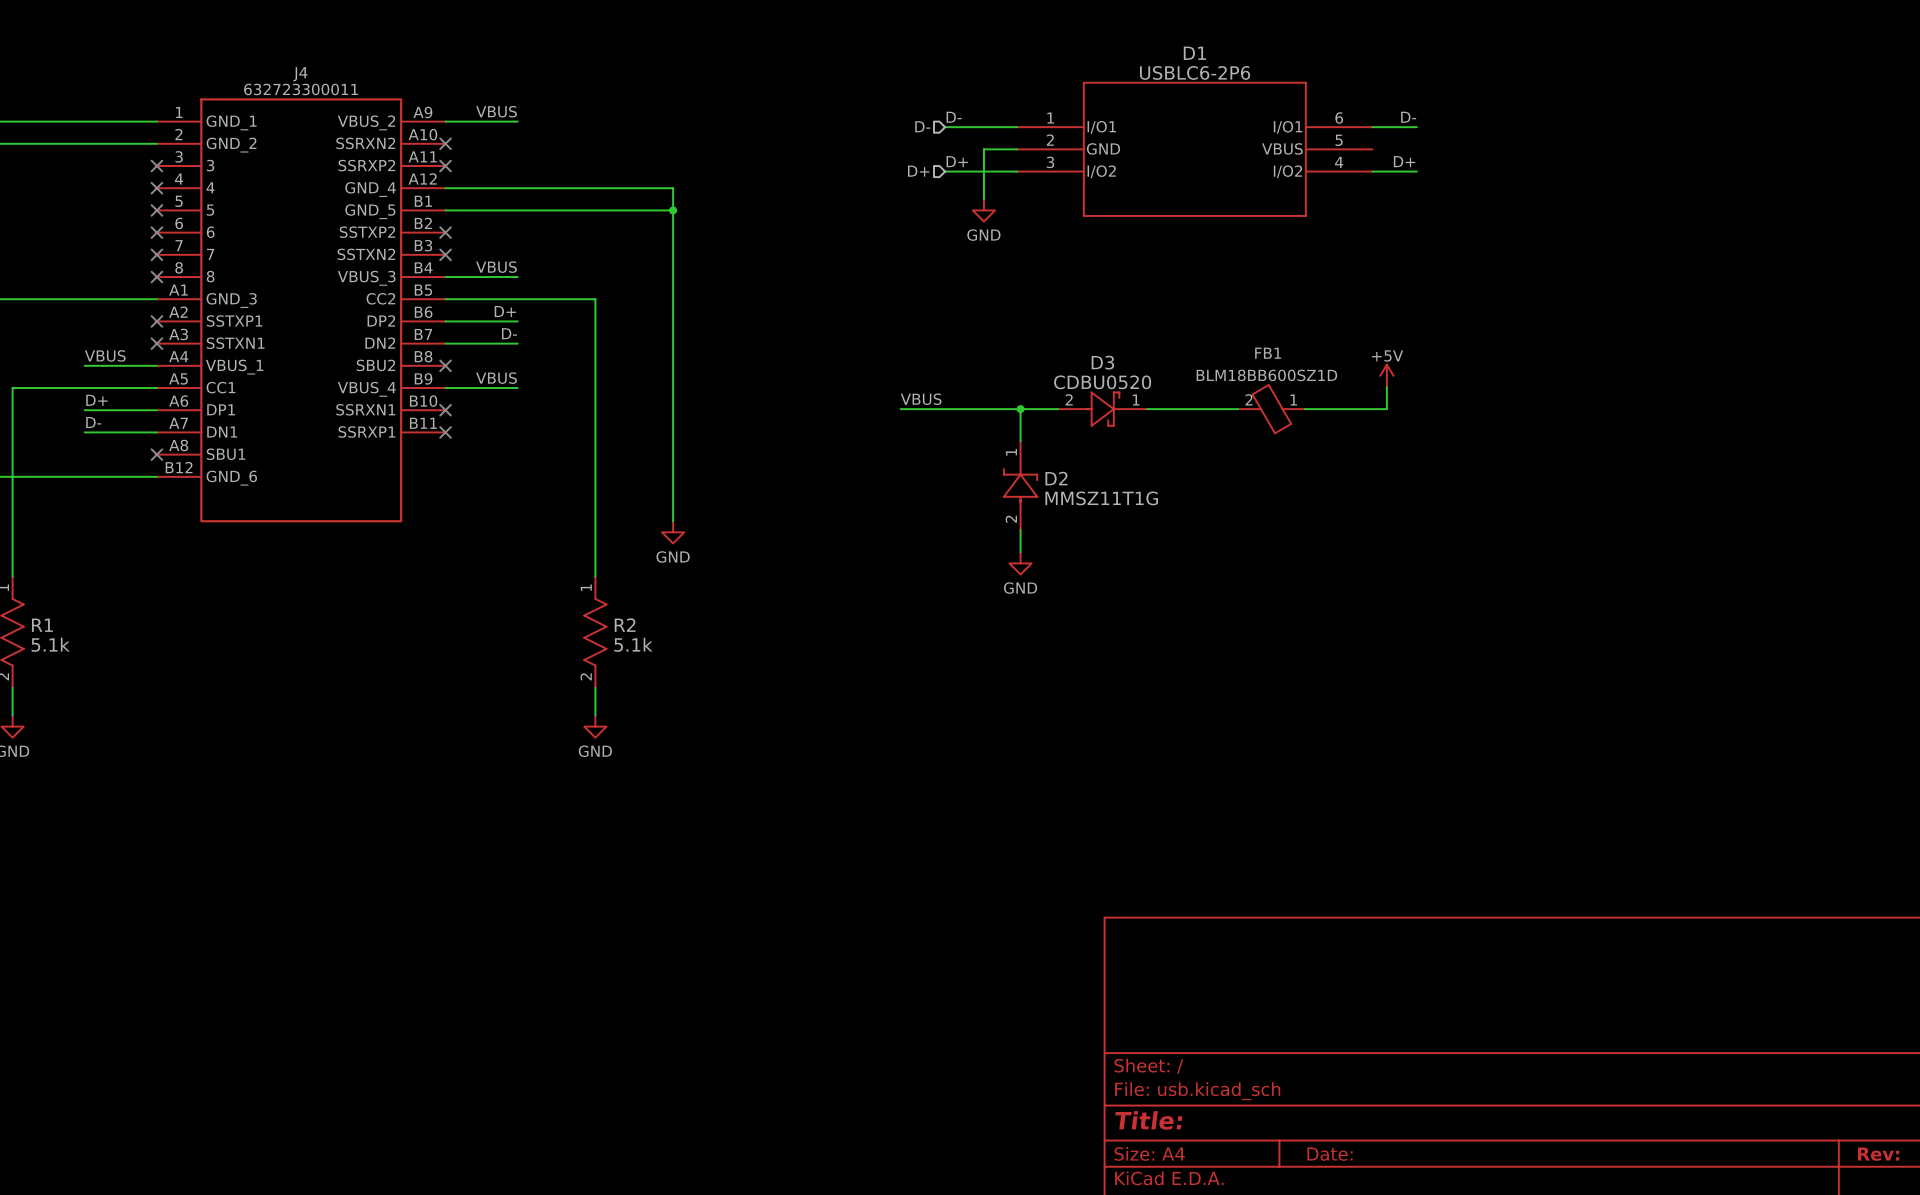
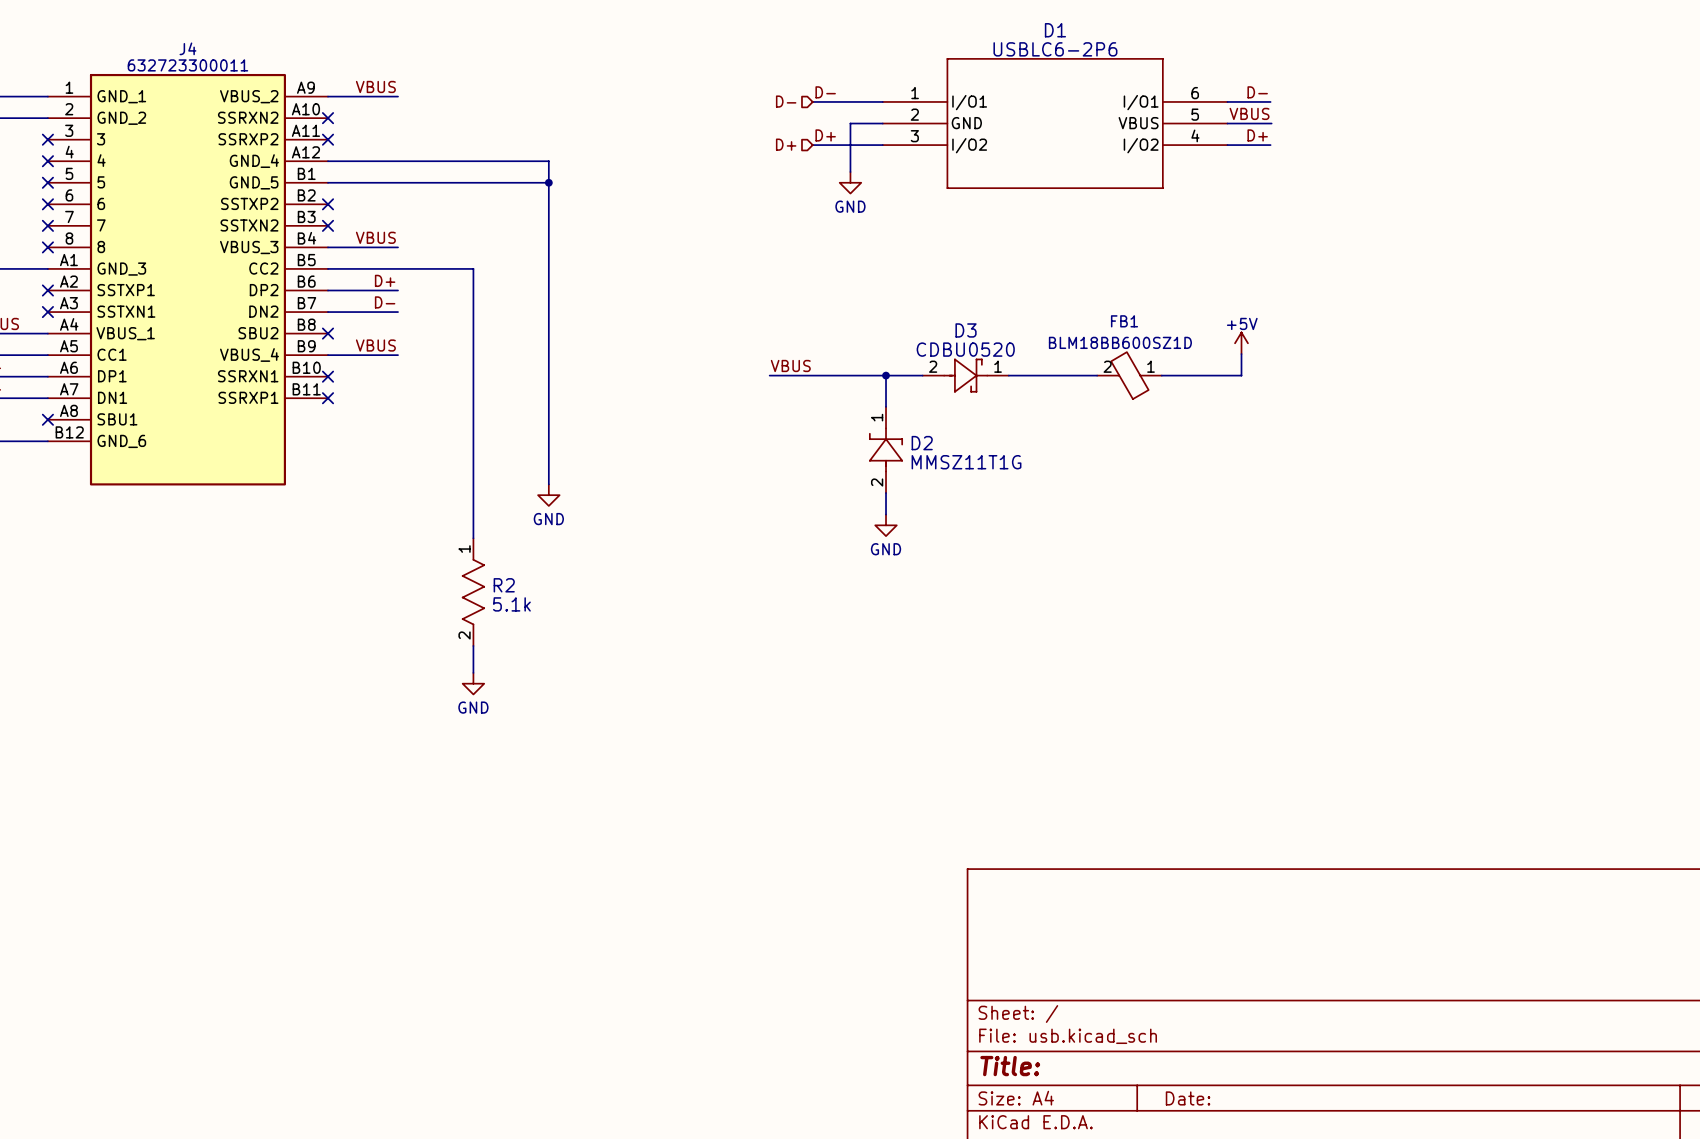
label: none -> VBUS (1249, 113)
wire: none -> (1227, 123) (1271, 123)

